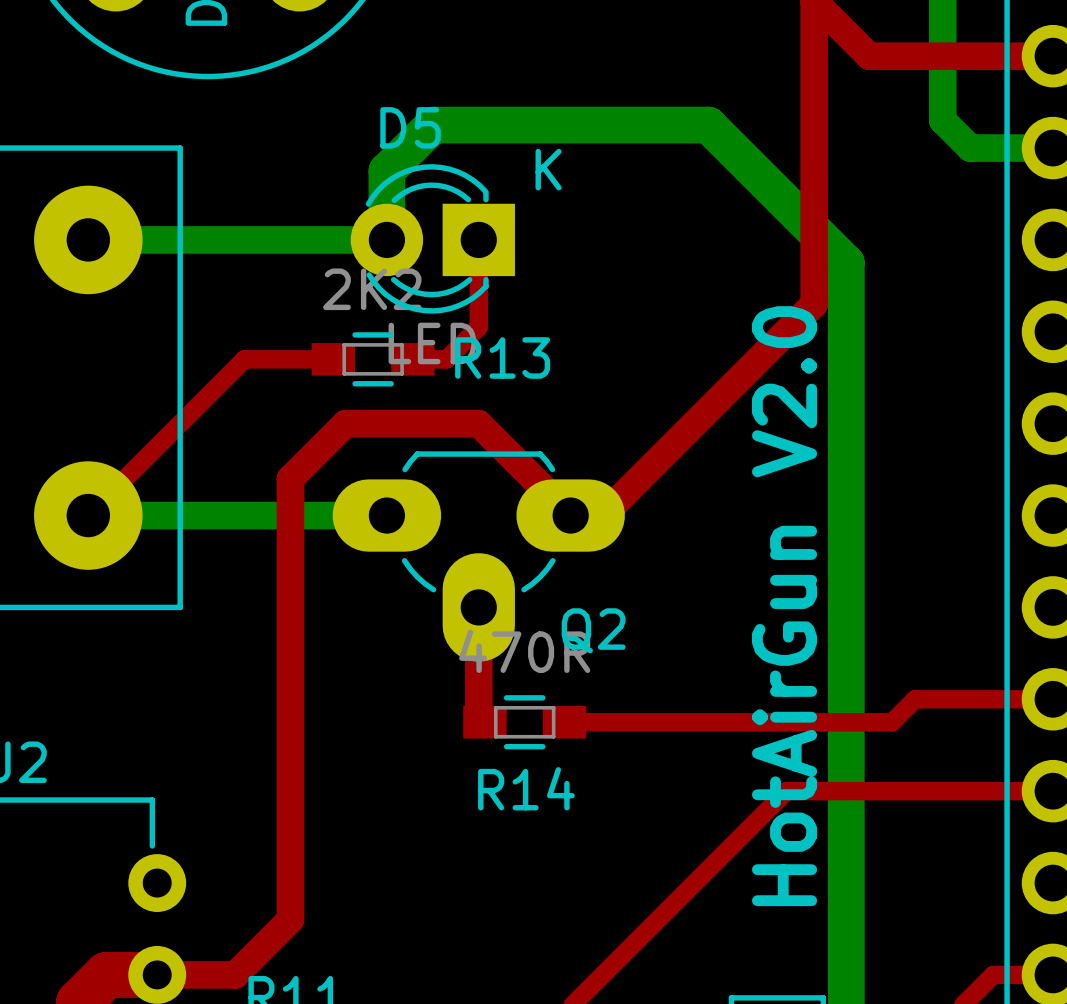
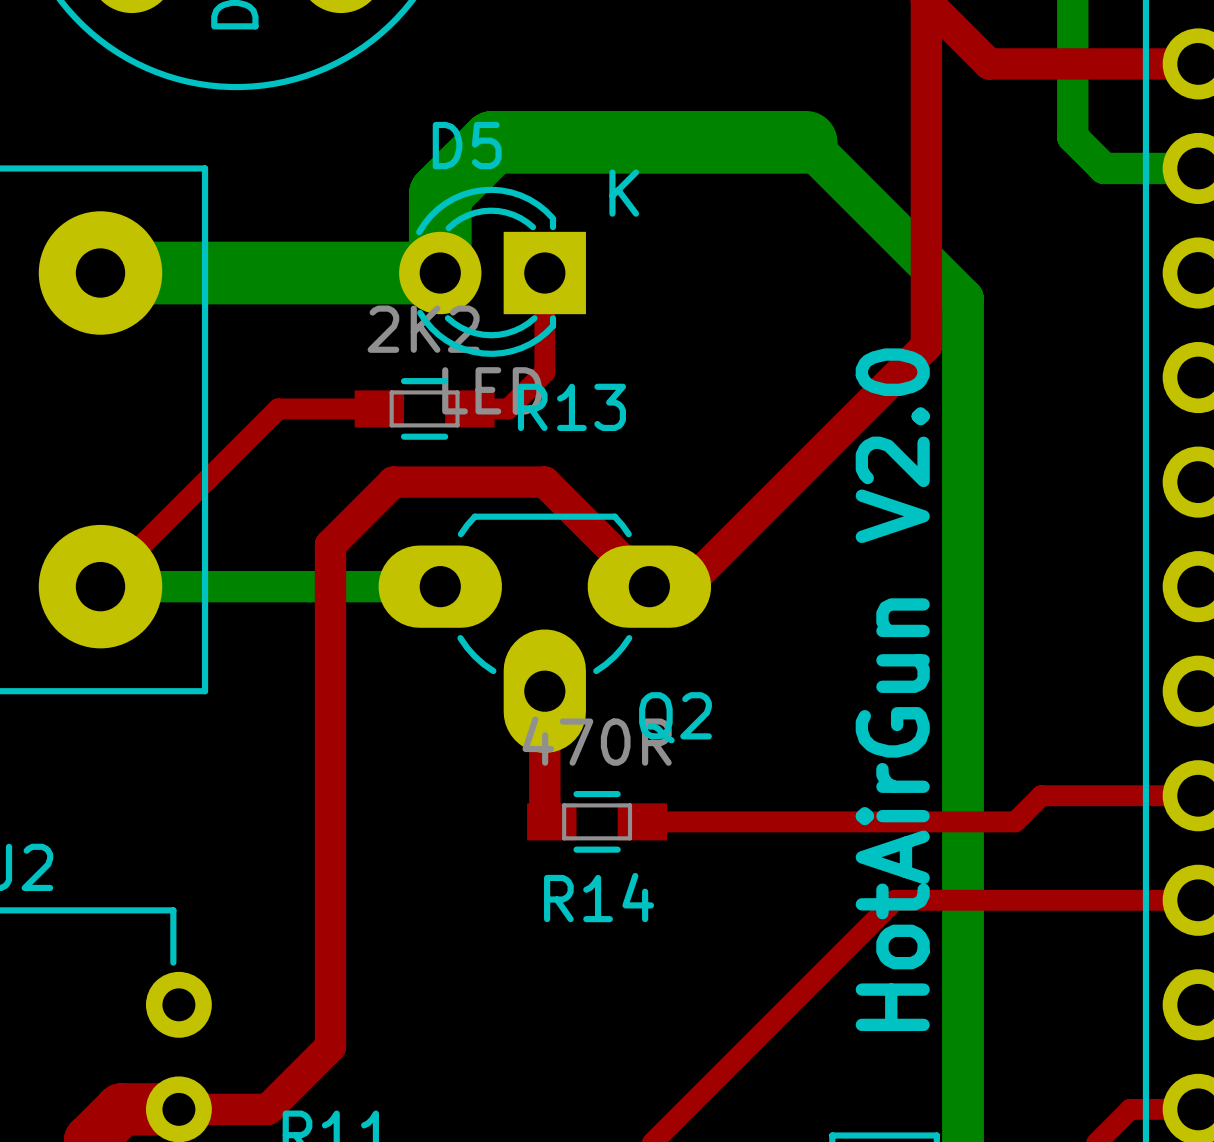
bottom track width: thin (708, 125) (432, 125) (386, 171) (386, 239) (88, 239) -> thick (806, 142) (492, 142) (440, 194) (440, 273) (100, 273)

